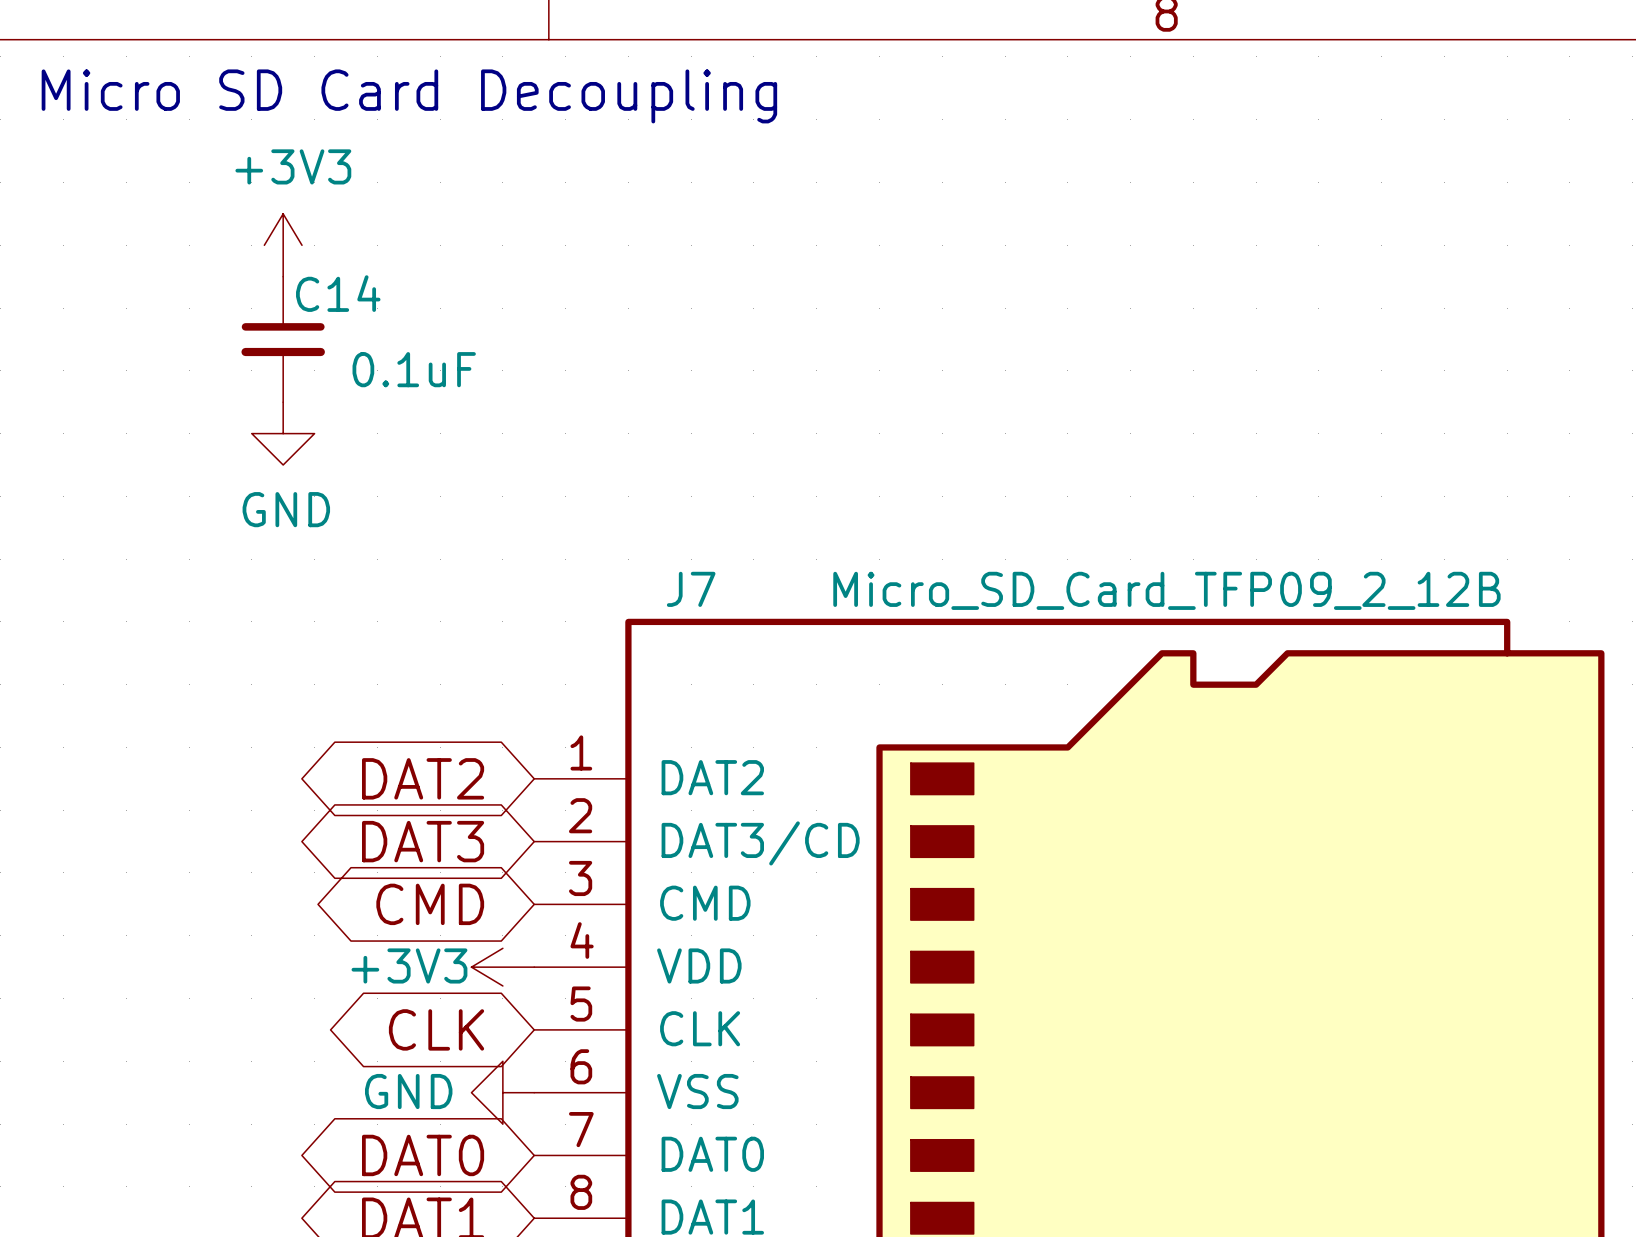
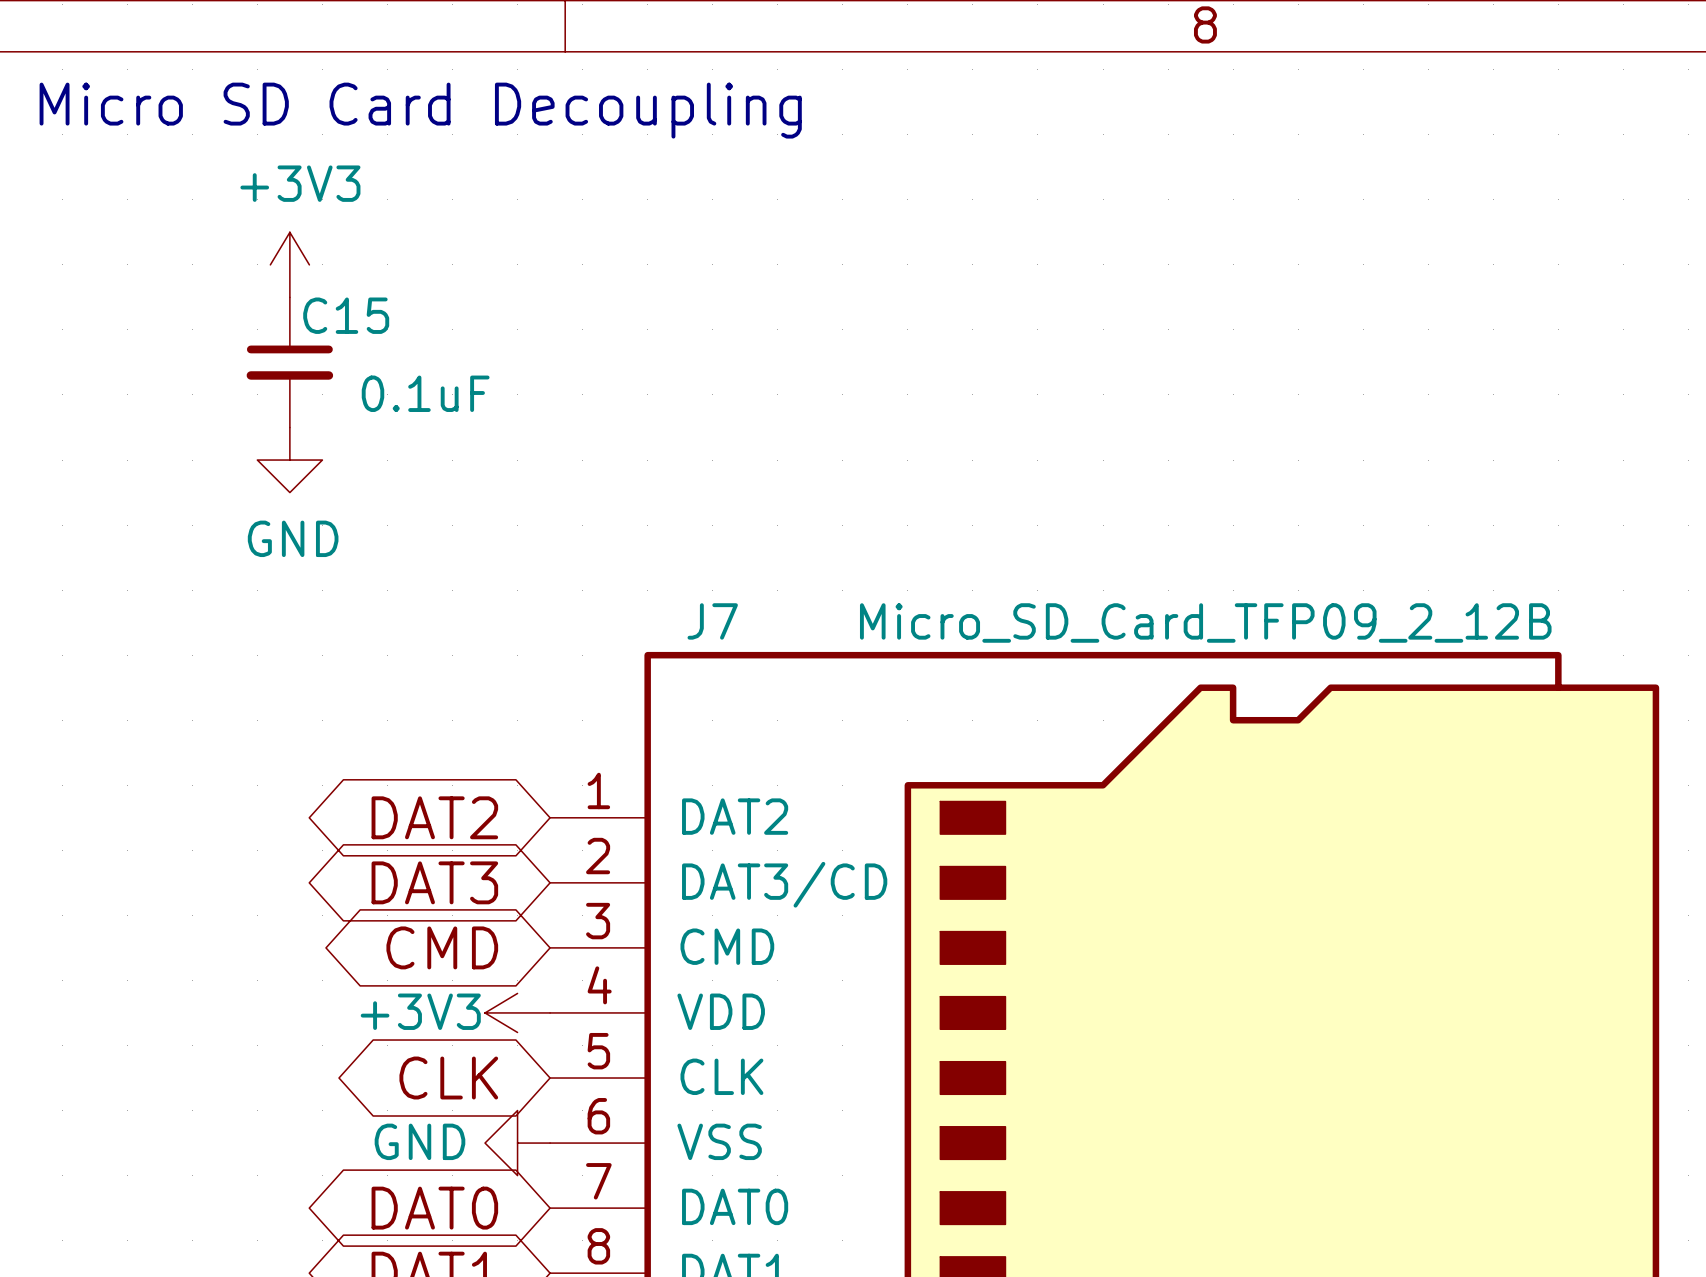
C14 name: C14 (338, 293) -> C15 (346, 315)

